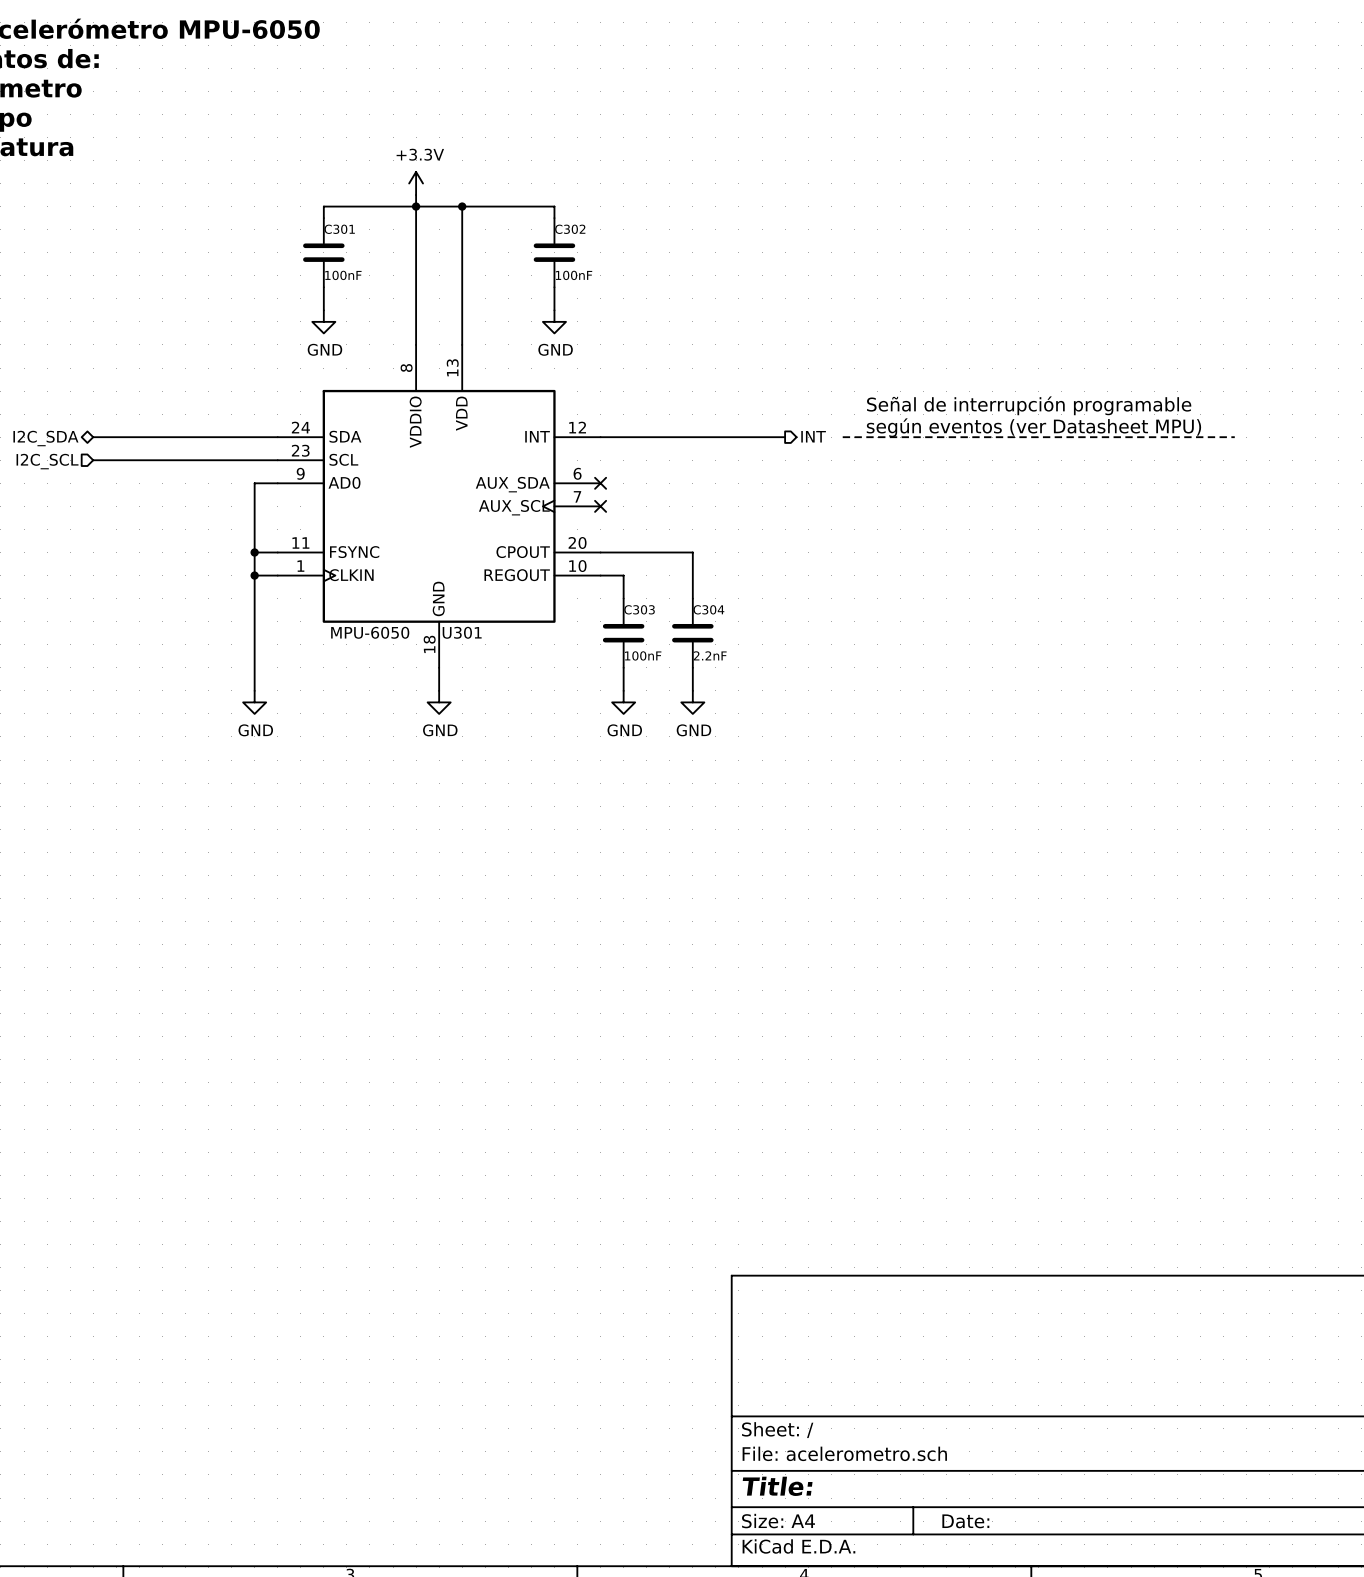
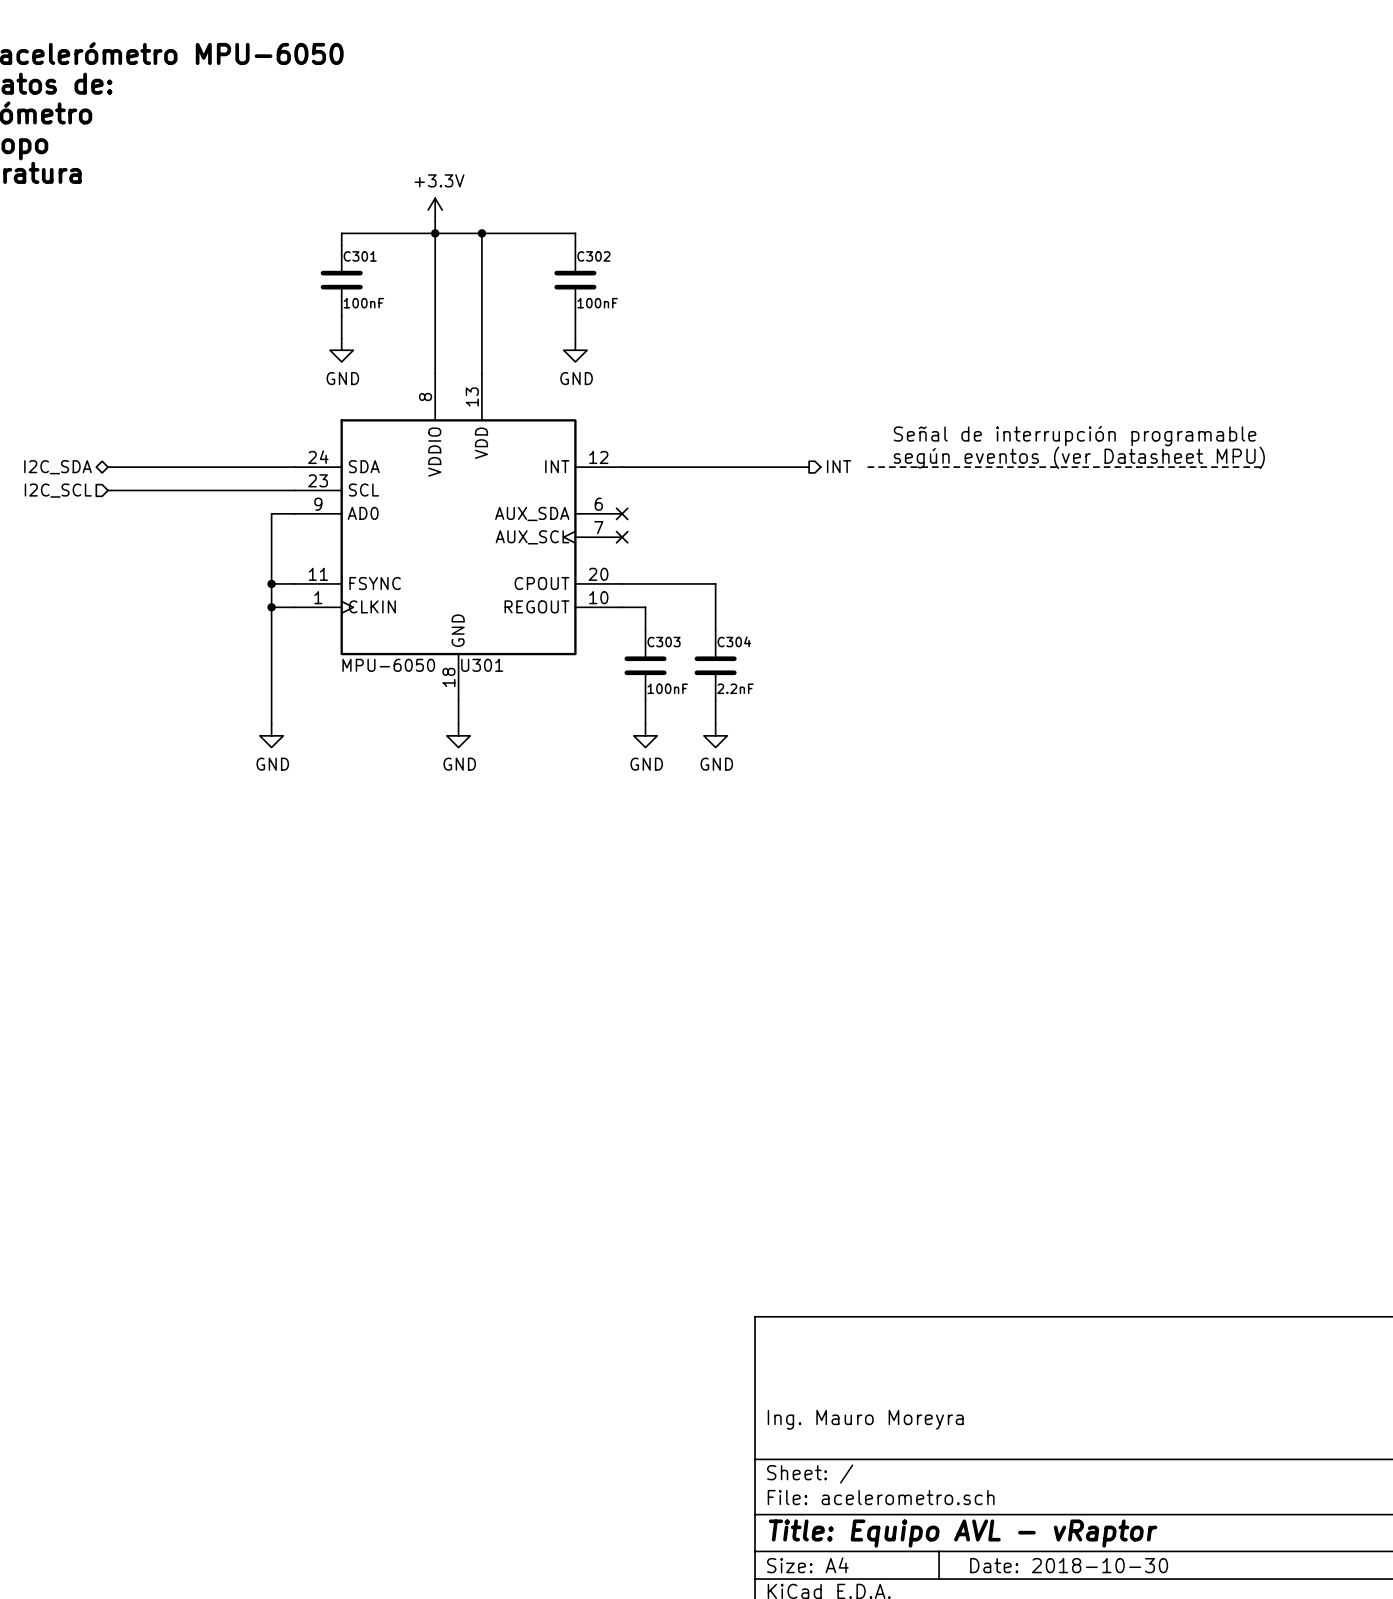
title block: none -> Ing. Mauro Moreyra (865, 1419)
title block: Title: (777, 1486) -> Title: Equipo AVL - vRaptor (963, 1533)
title block: Date: (965, 1521) -> Date: 2018-10-30 (1069, 1565)

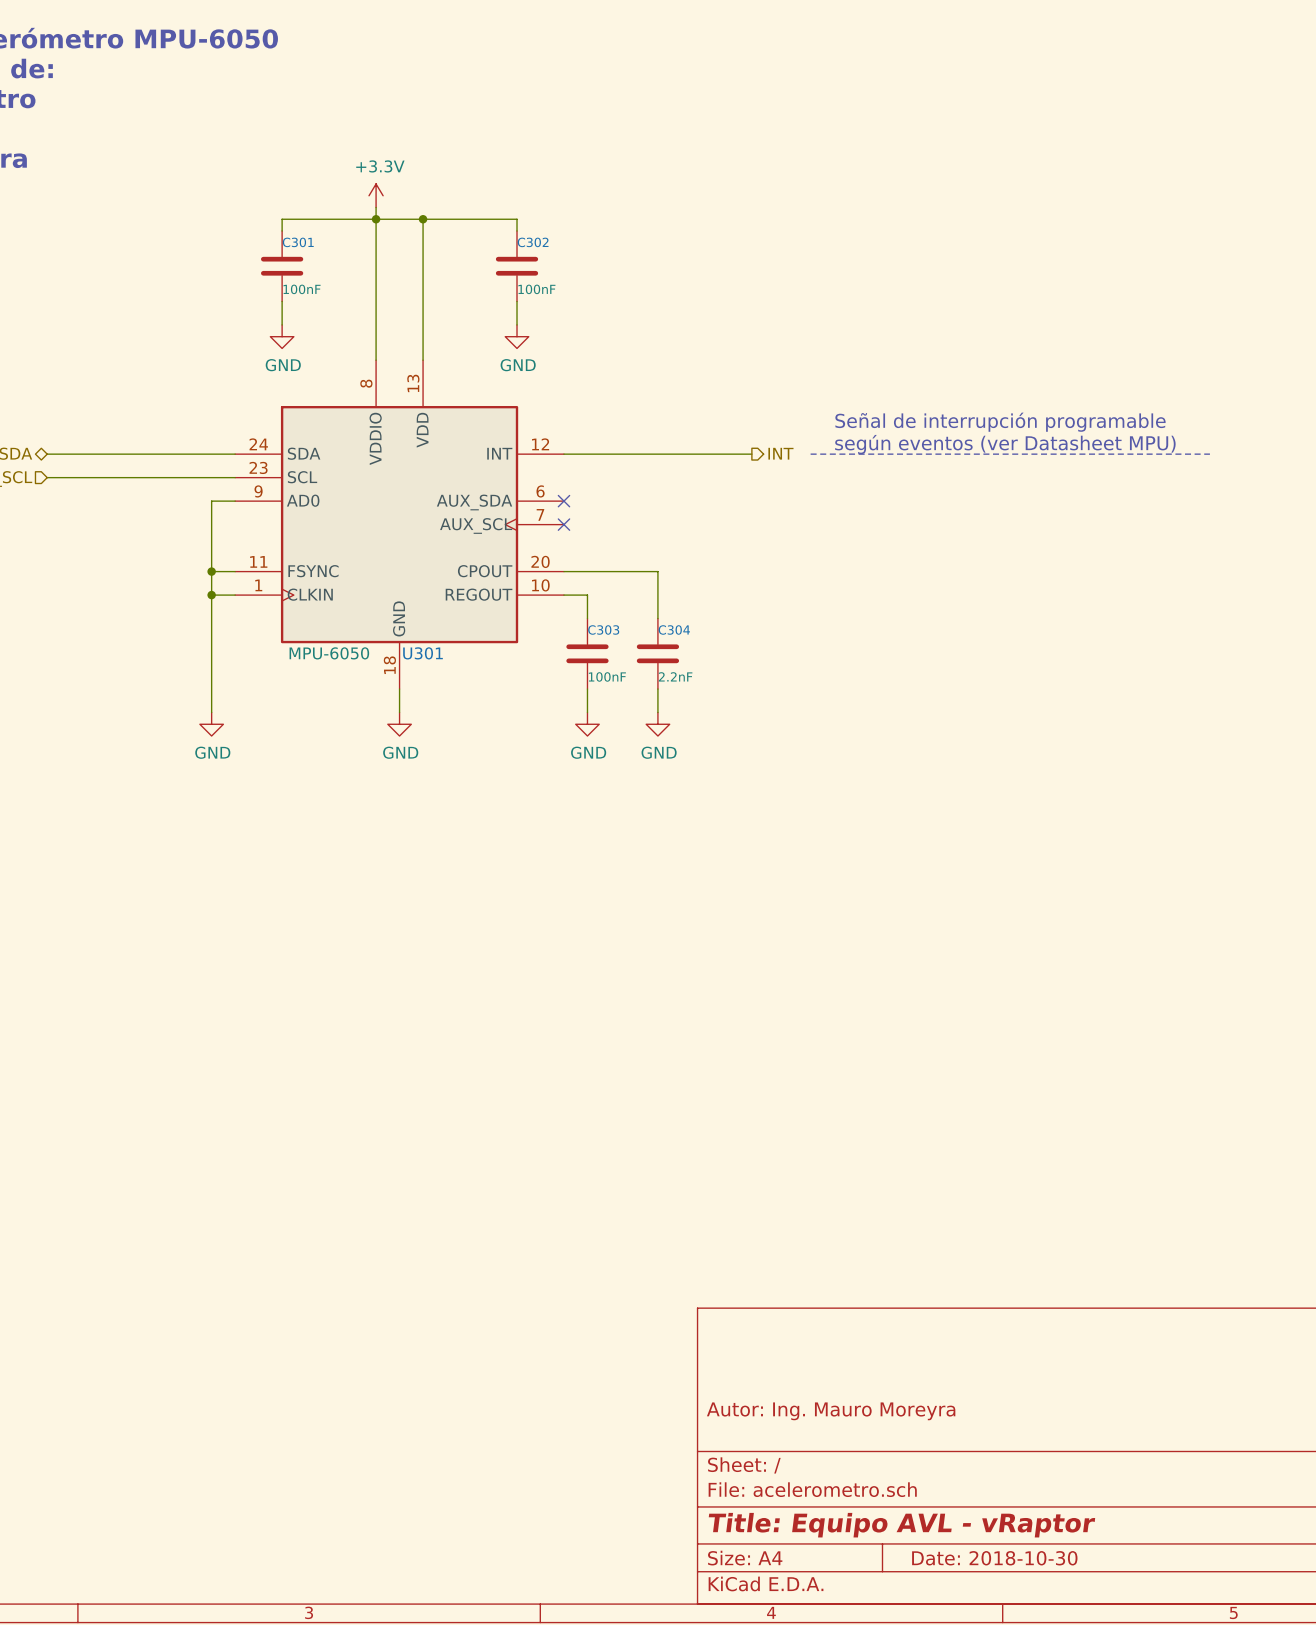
title block: Ing. Mauro Moreyra (865, 1419) -> Autor: Ing. Mauro Moreyra (831, 1411)

